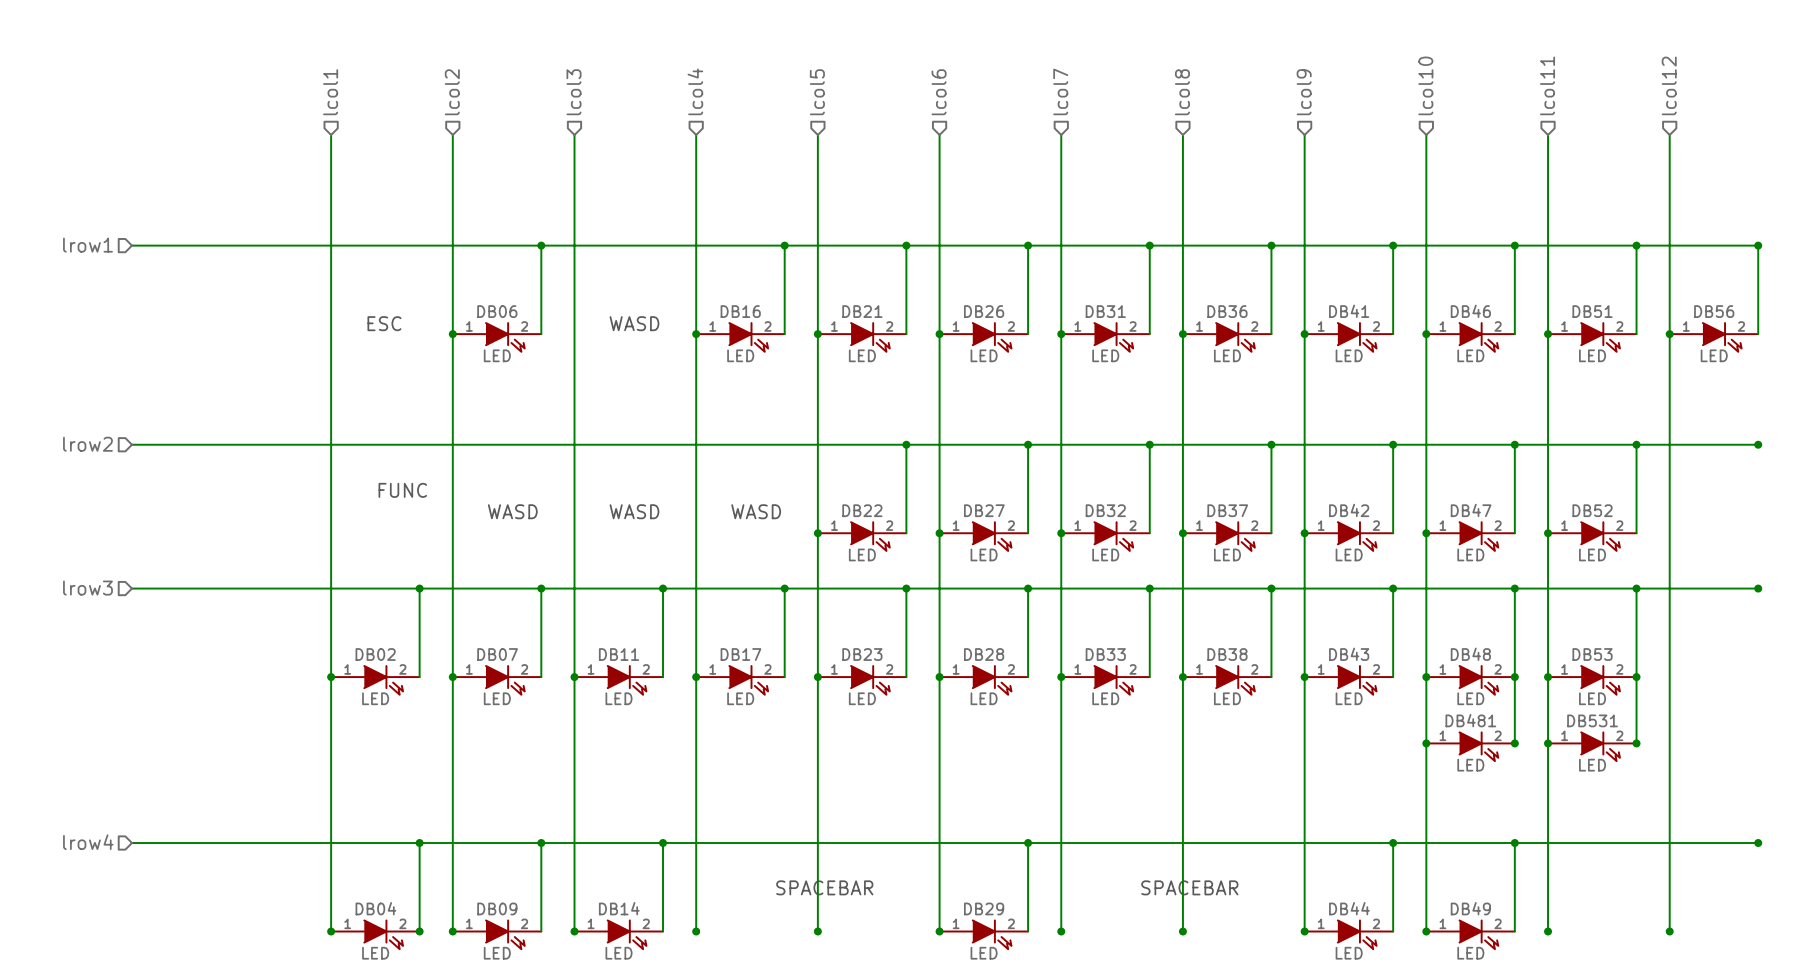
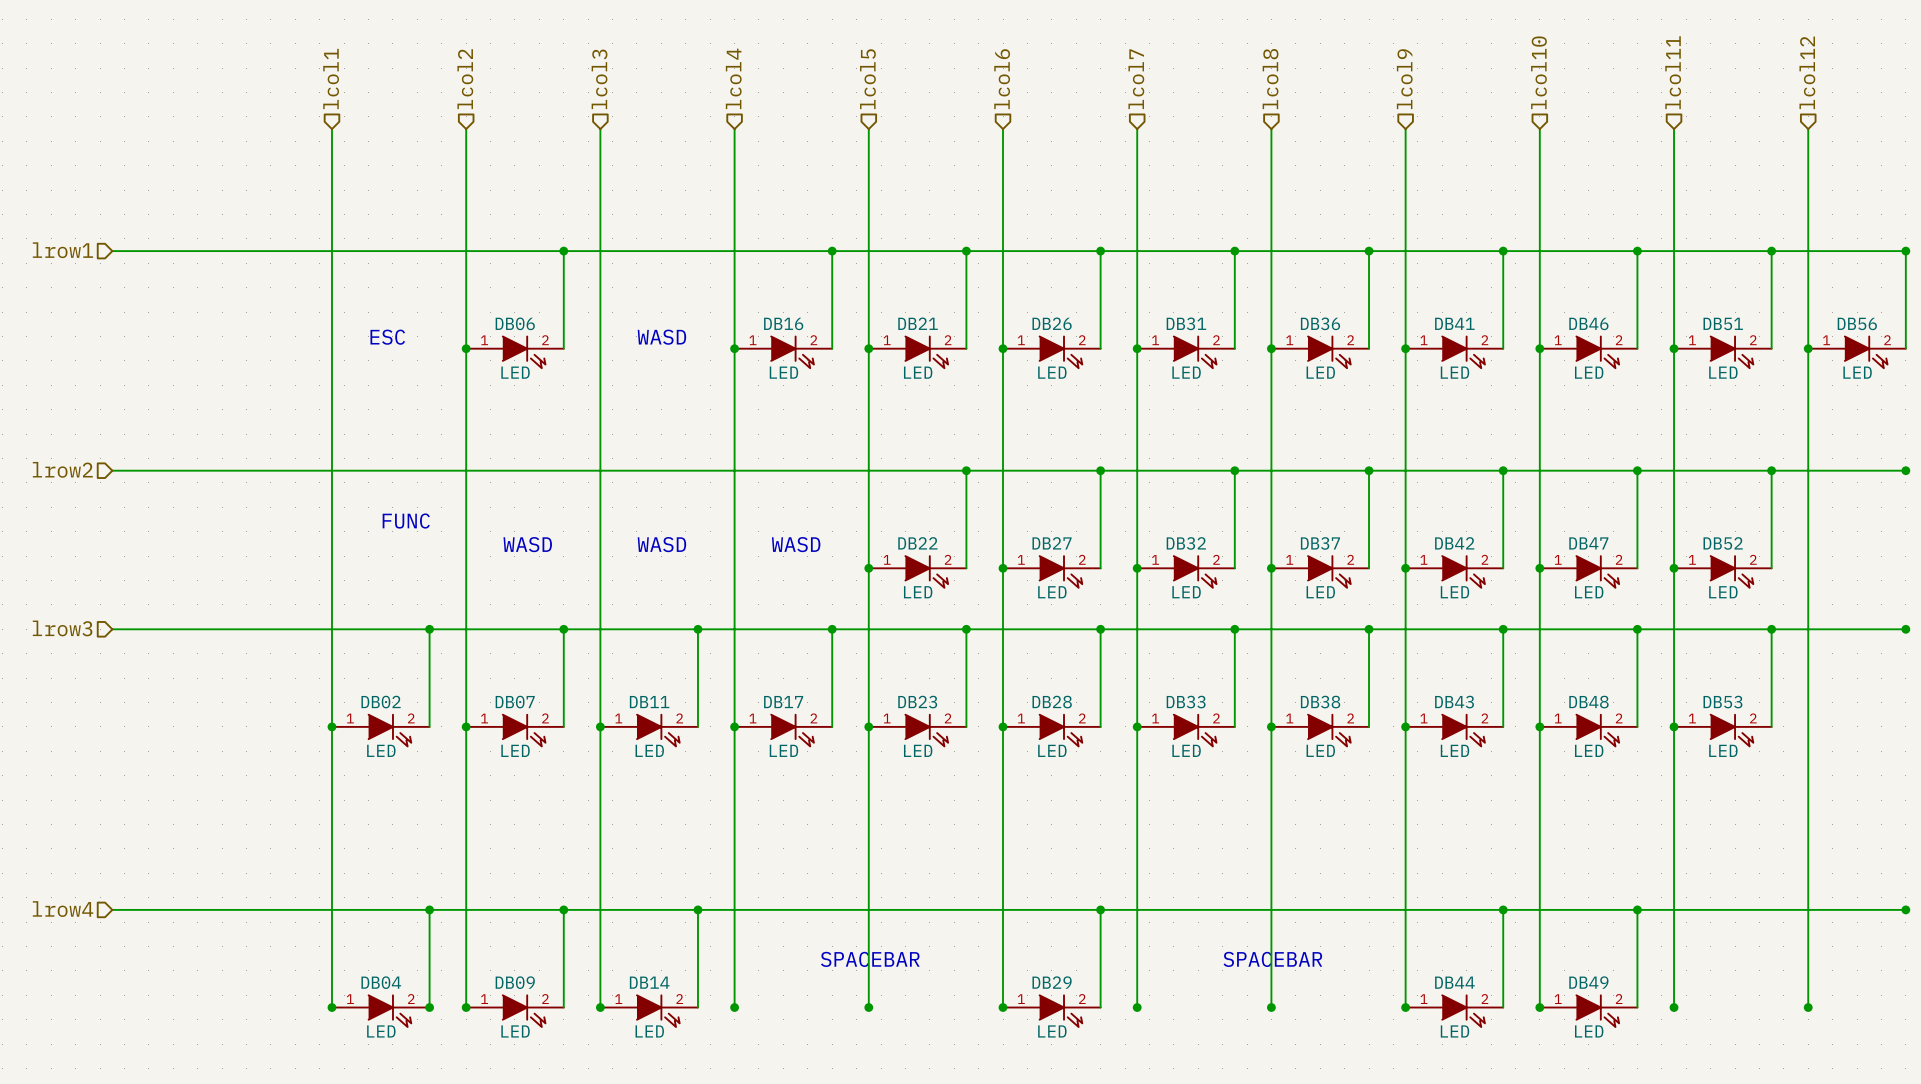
wire: (1514, 677) (1514, 743) -> none
junction: (1514, 677) -> none
wire: (1636, 677) (1636, 743) -> none
junction: (1636, 677) -> none
junction: (1426, 743) -> none
junction: (1514, 743) -> none
junction: (1548, 743) -> none
junction: (1636, 743) -> none
DB481: LED (1470, 746) -> none
DB531: LED (1592, 746) -> none

